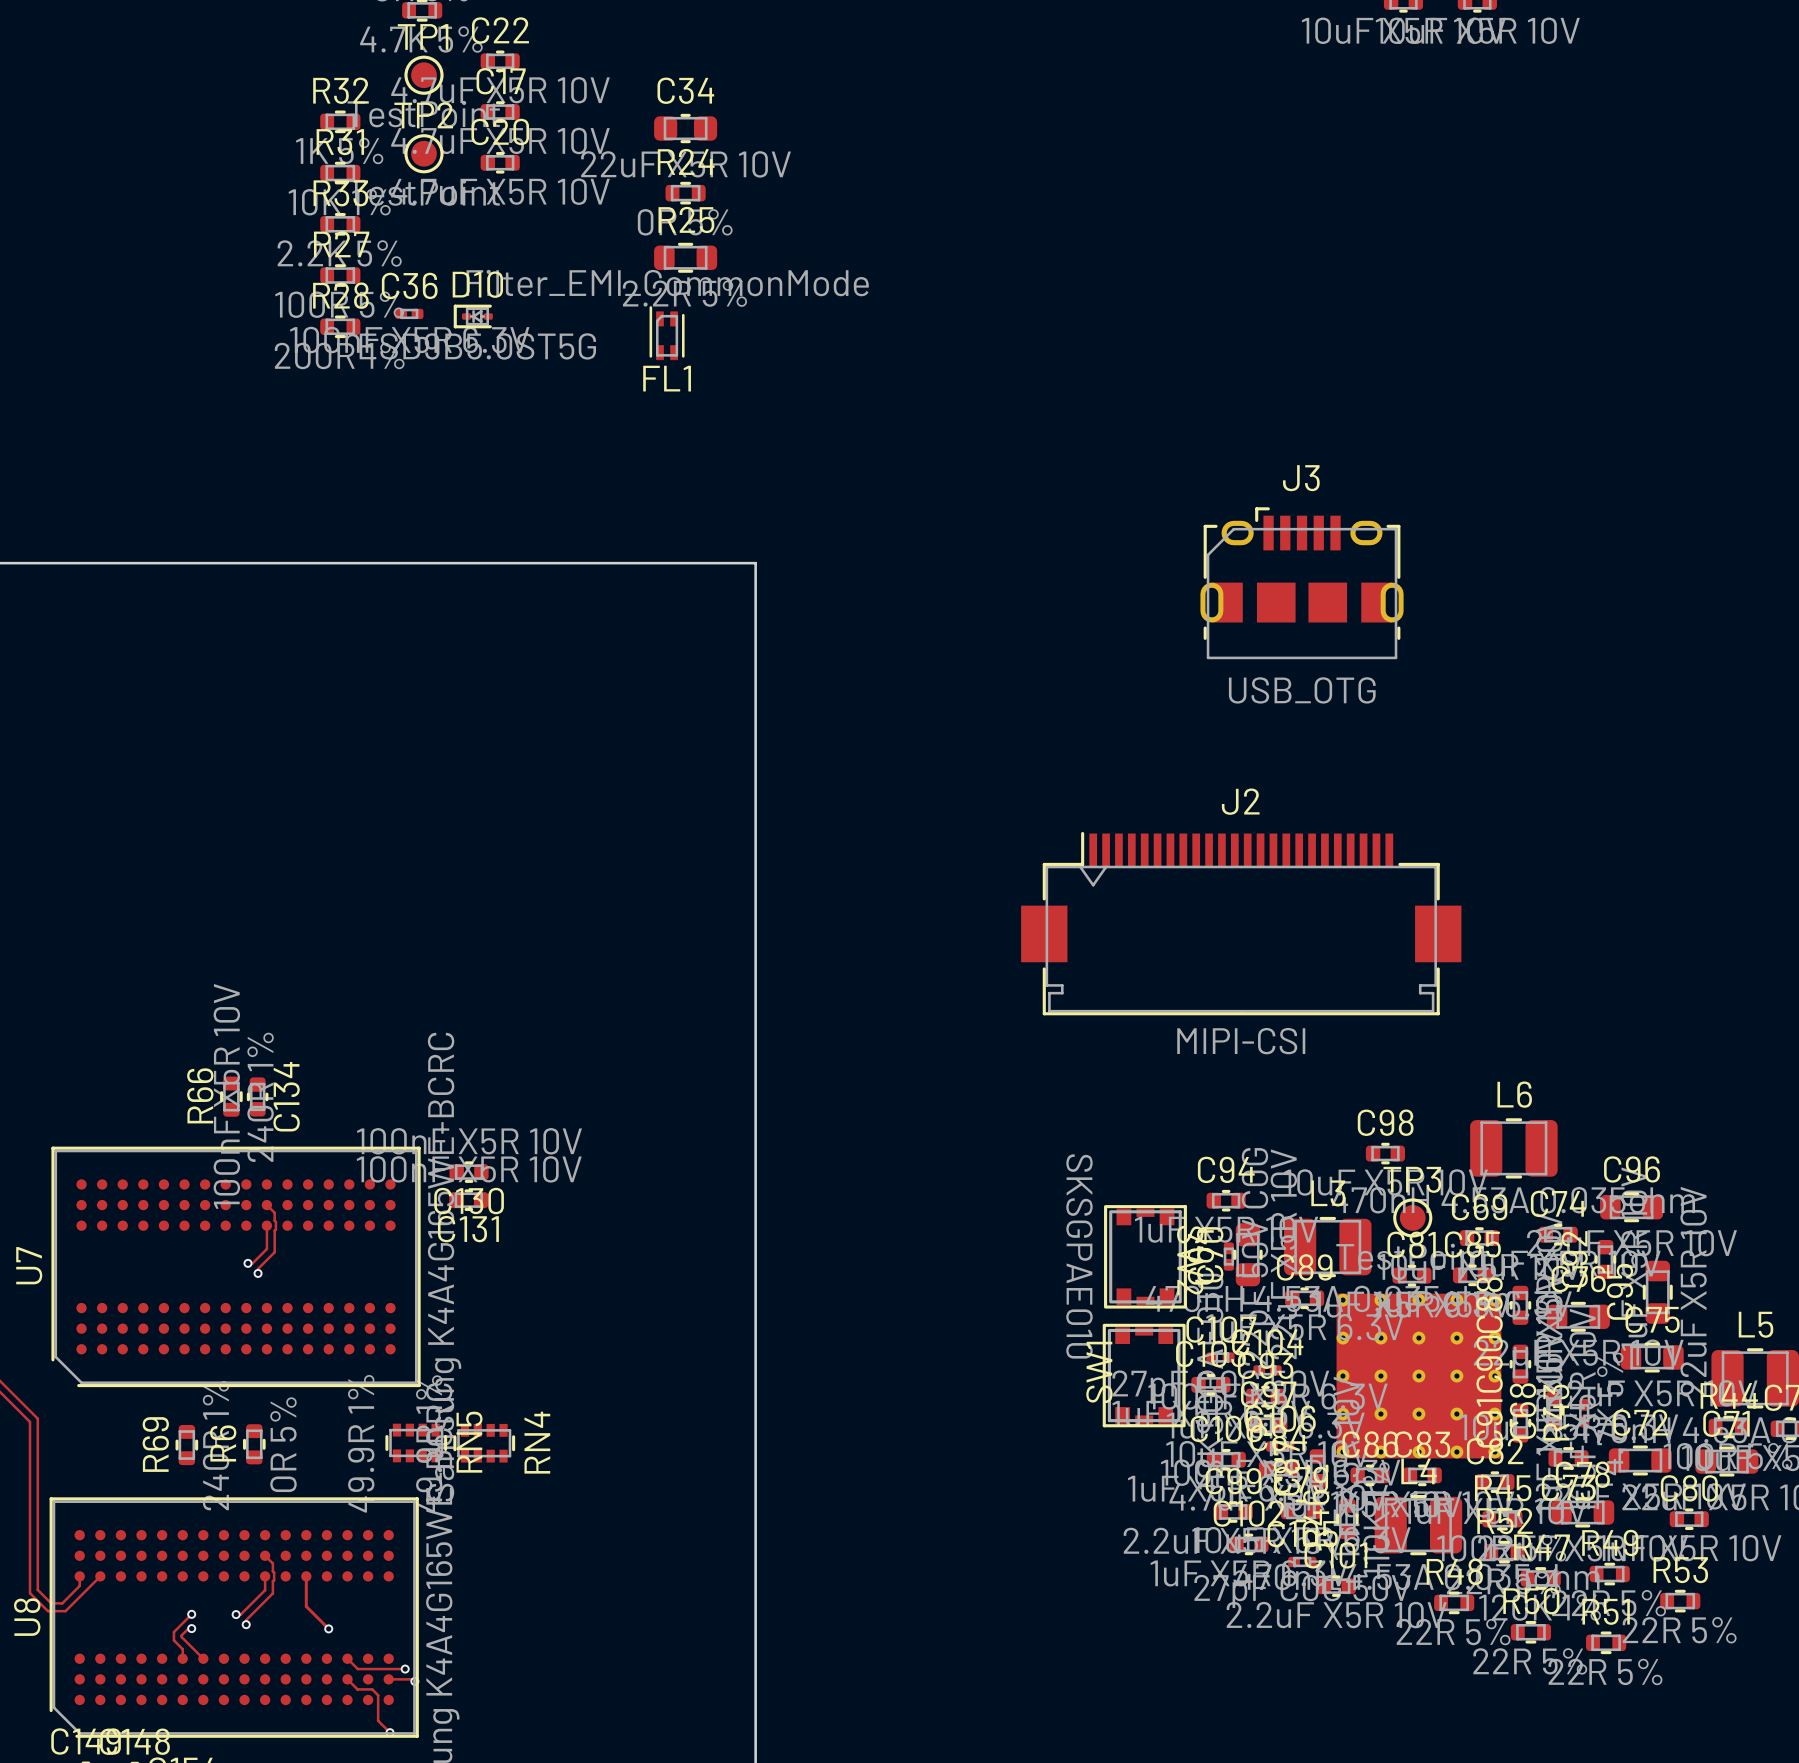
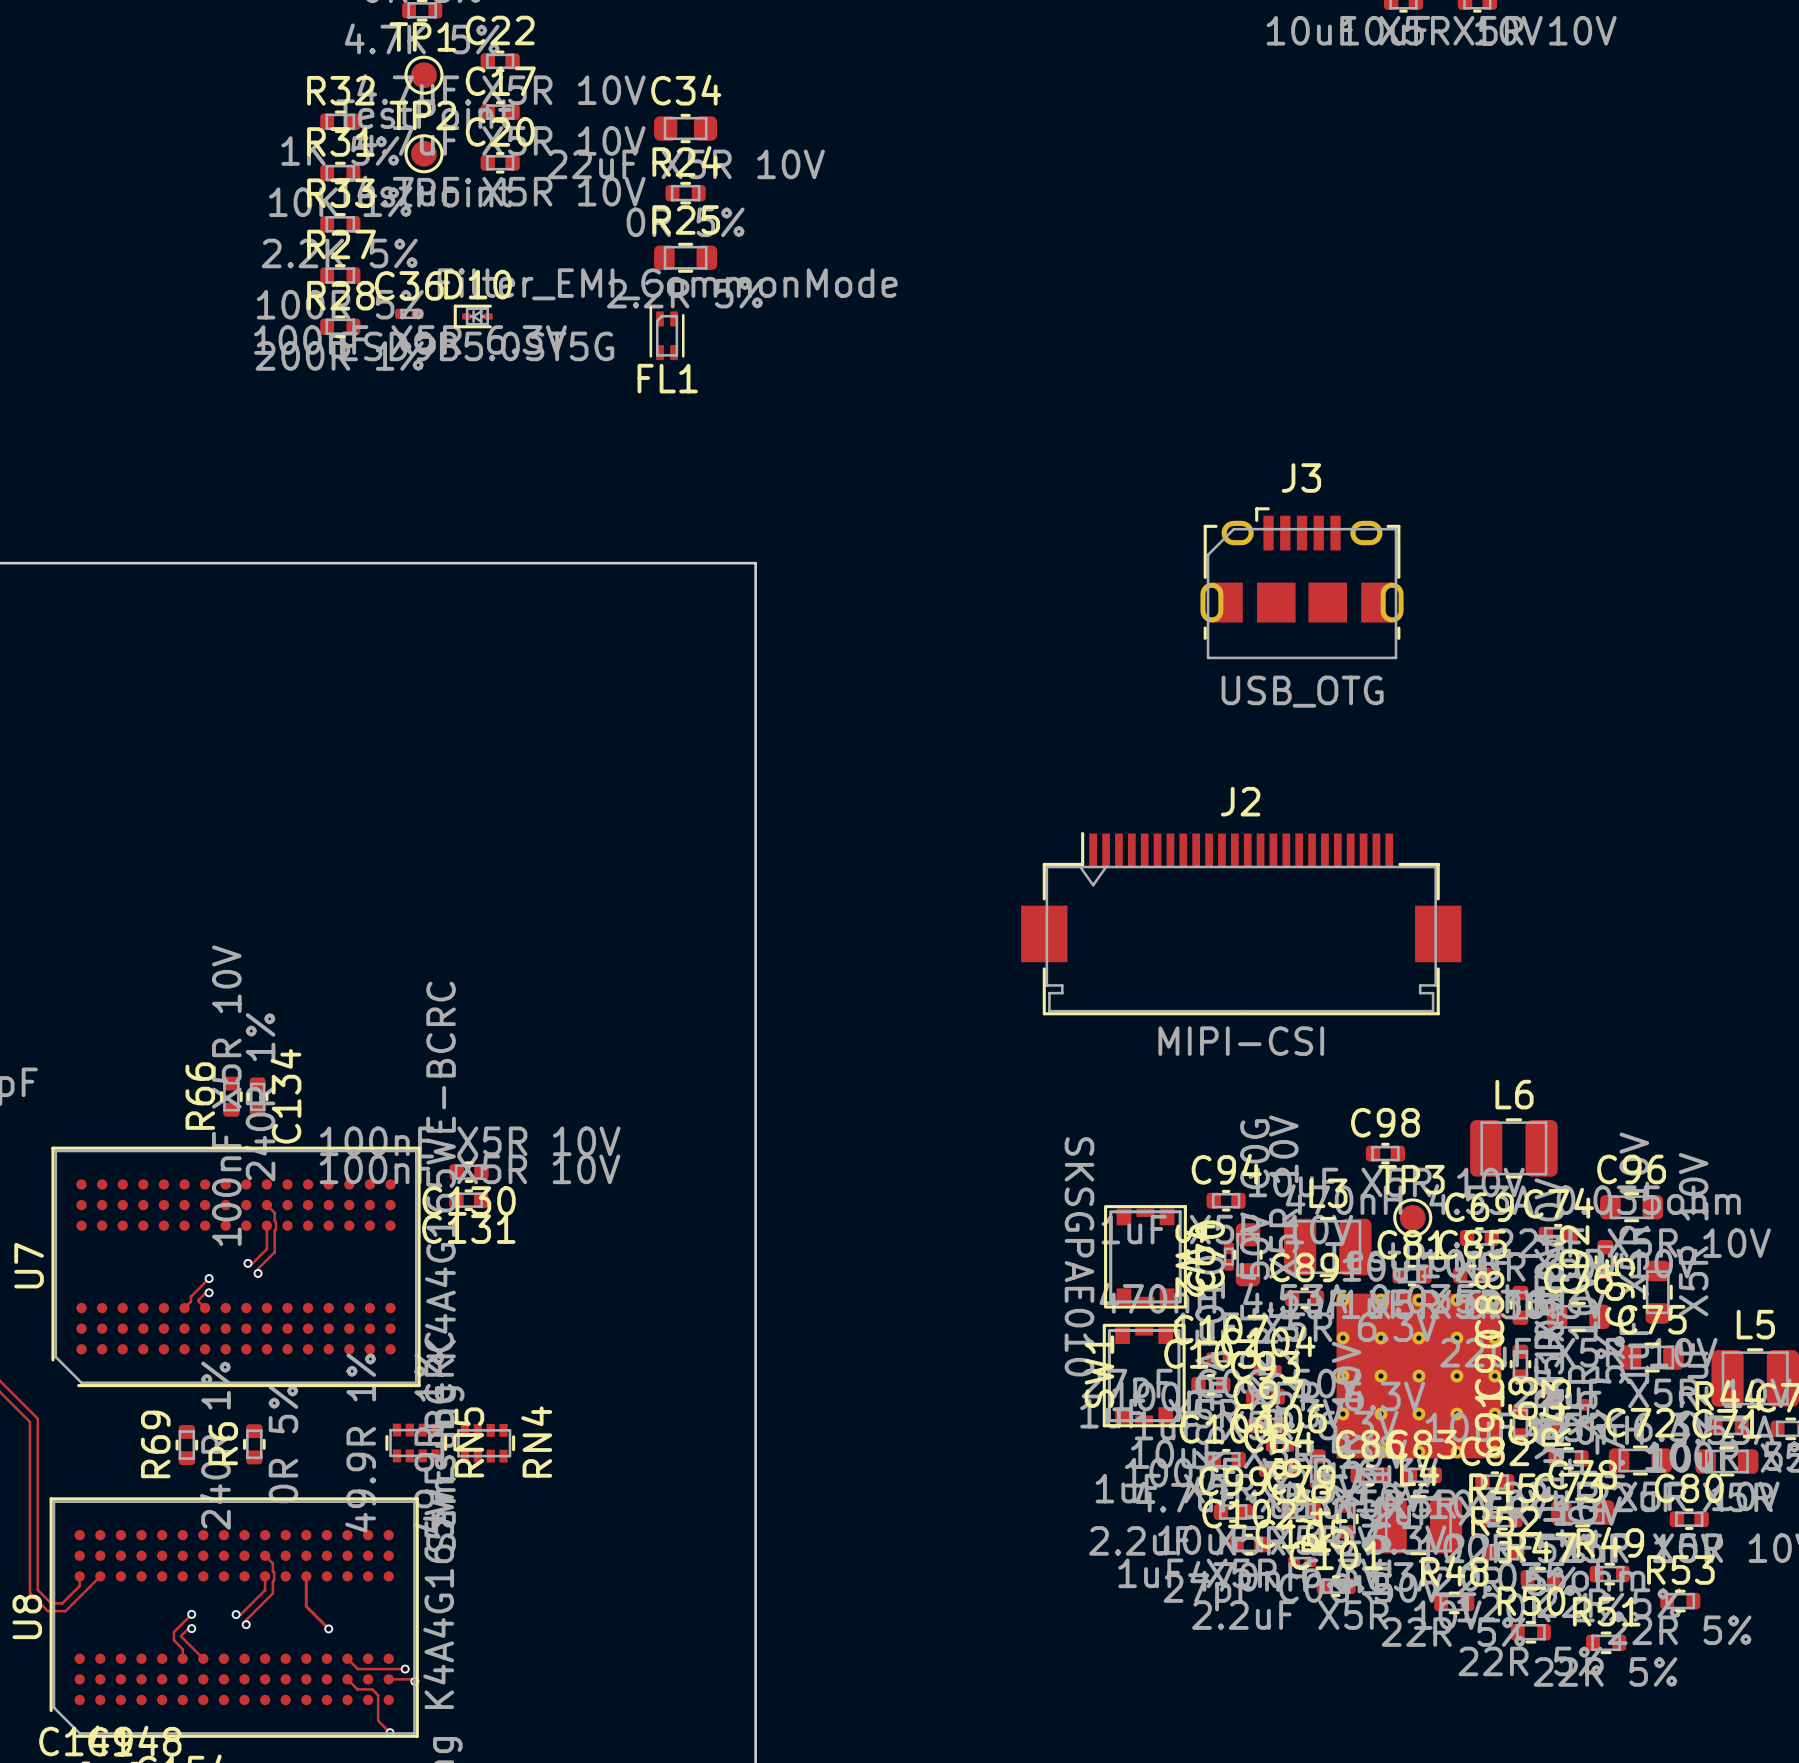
track: none -> (209, 1278) (190, 1296) (190, 1301) (184, 1308)
via: none -> (209, 1278)
track: none -> (209, 1292) (205, 1292) (198, 1299) (205, 1308)
via: none -> (209, 1292)

